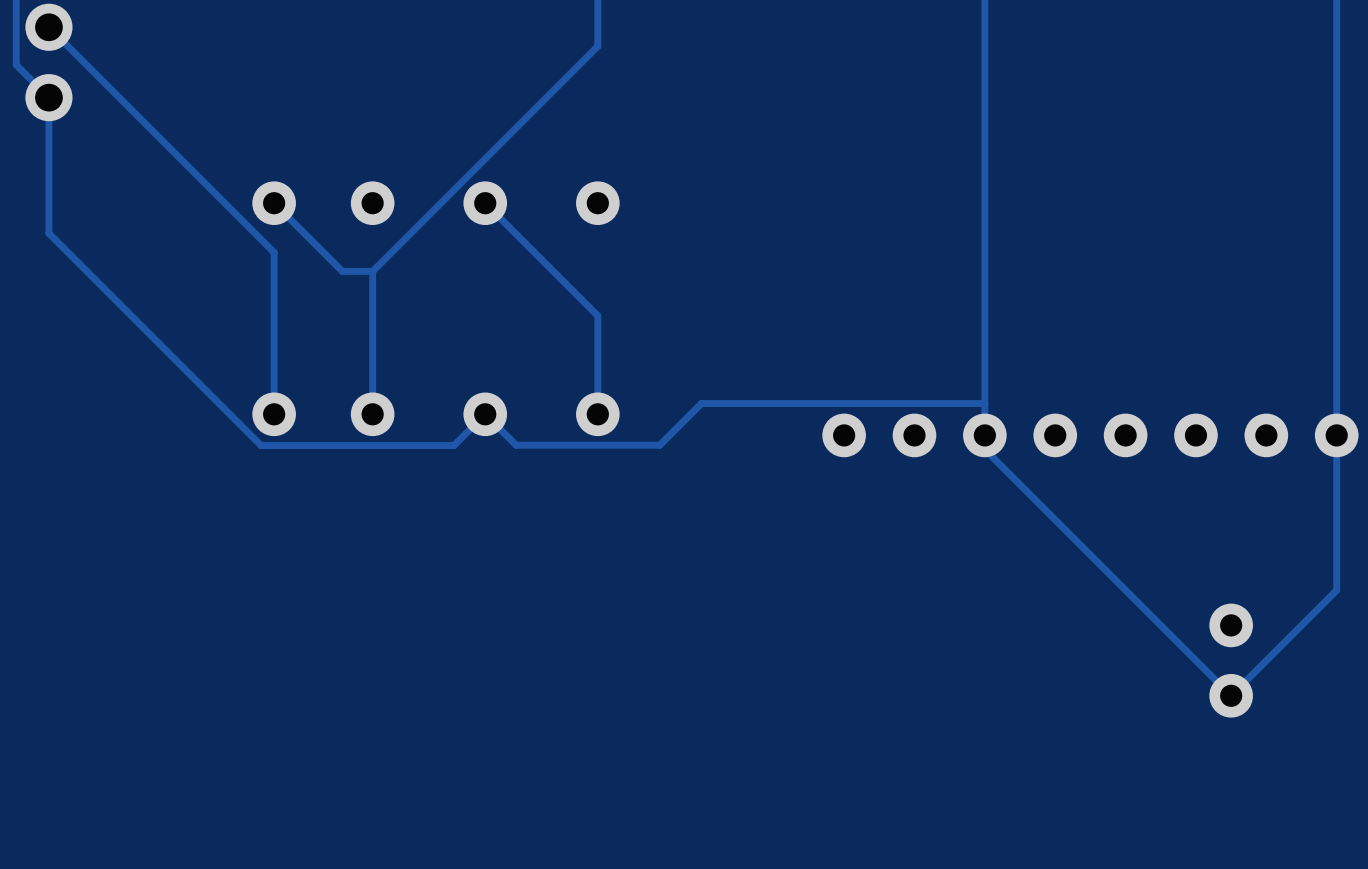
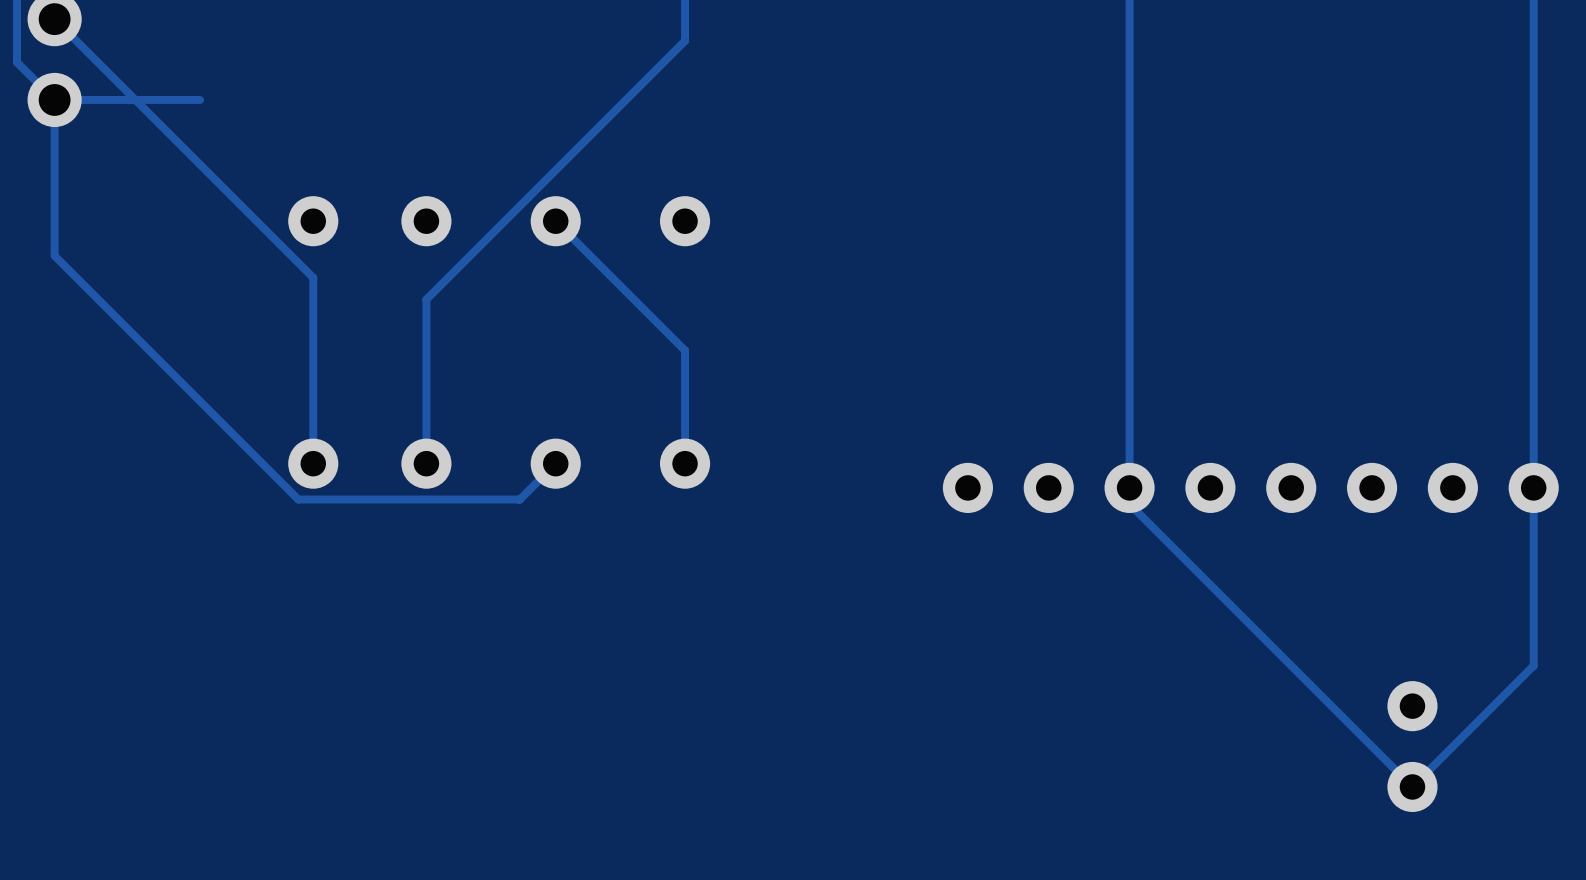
track: none -> (200, 99) (78, 99)
track: (274, 203) (342, 271) (372, 271) -> none
track: (984, 403) (701, 403) (659, 445) (516, 445) (485, 414) -> none

